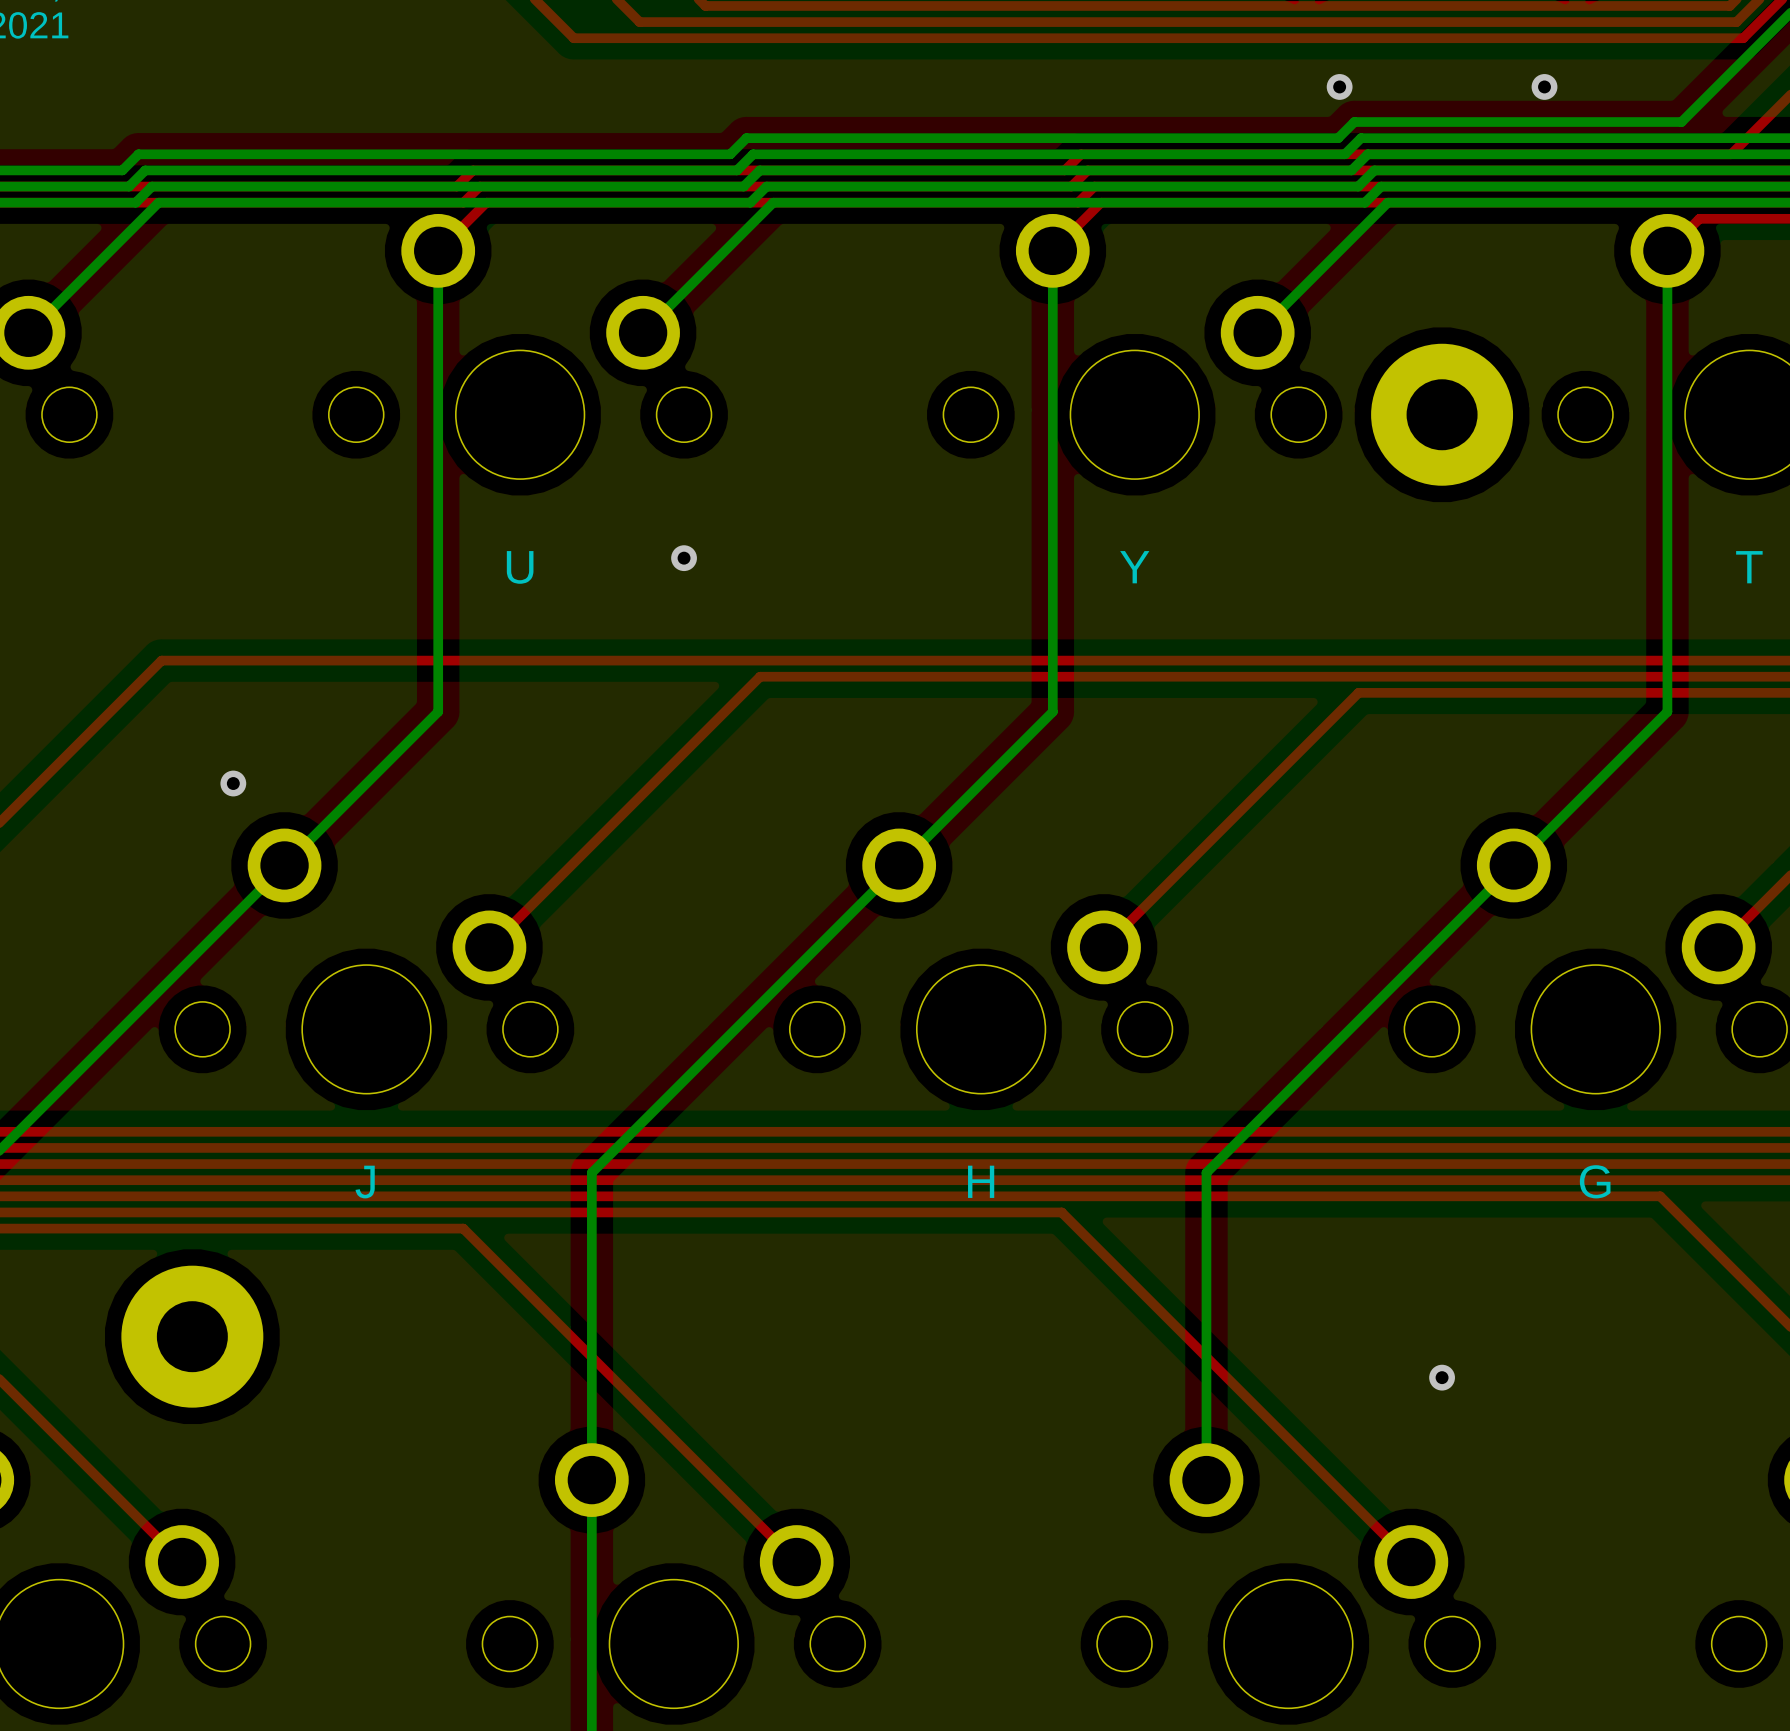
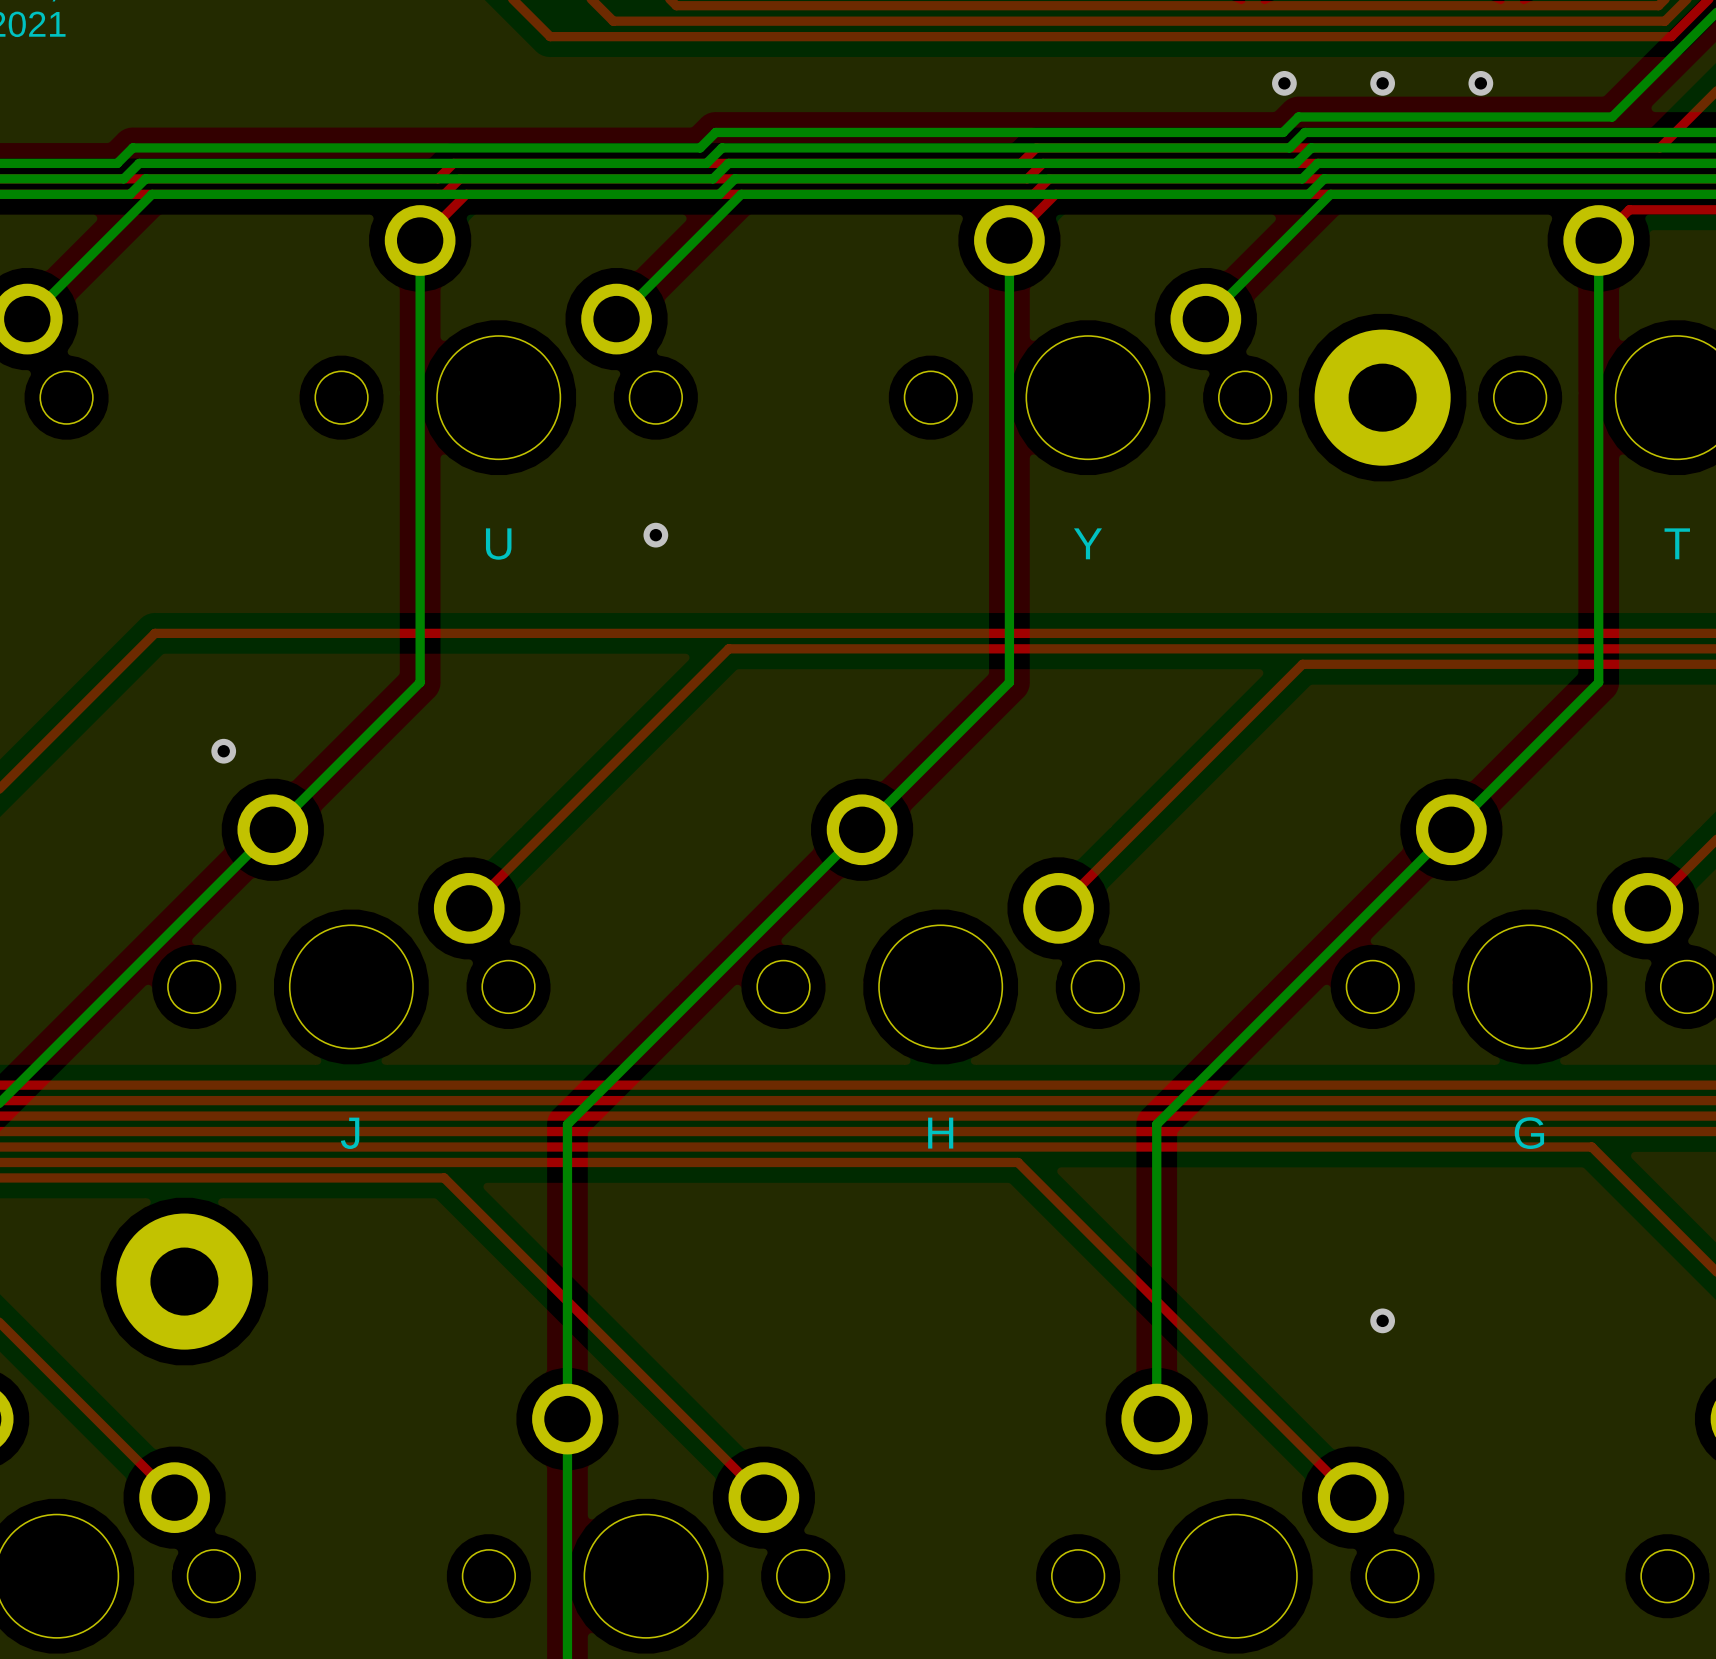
via: none -> (1382, 83)

